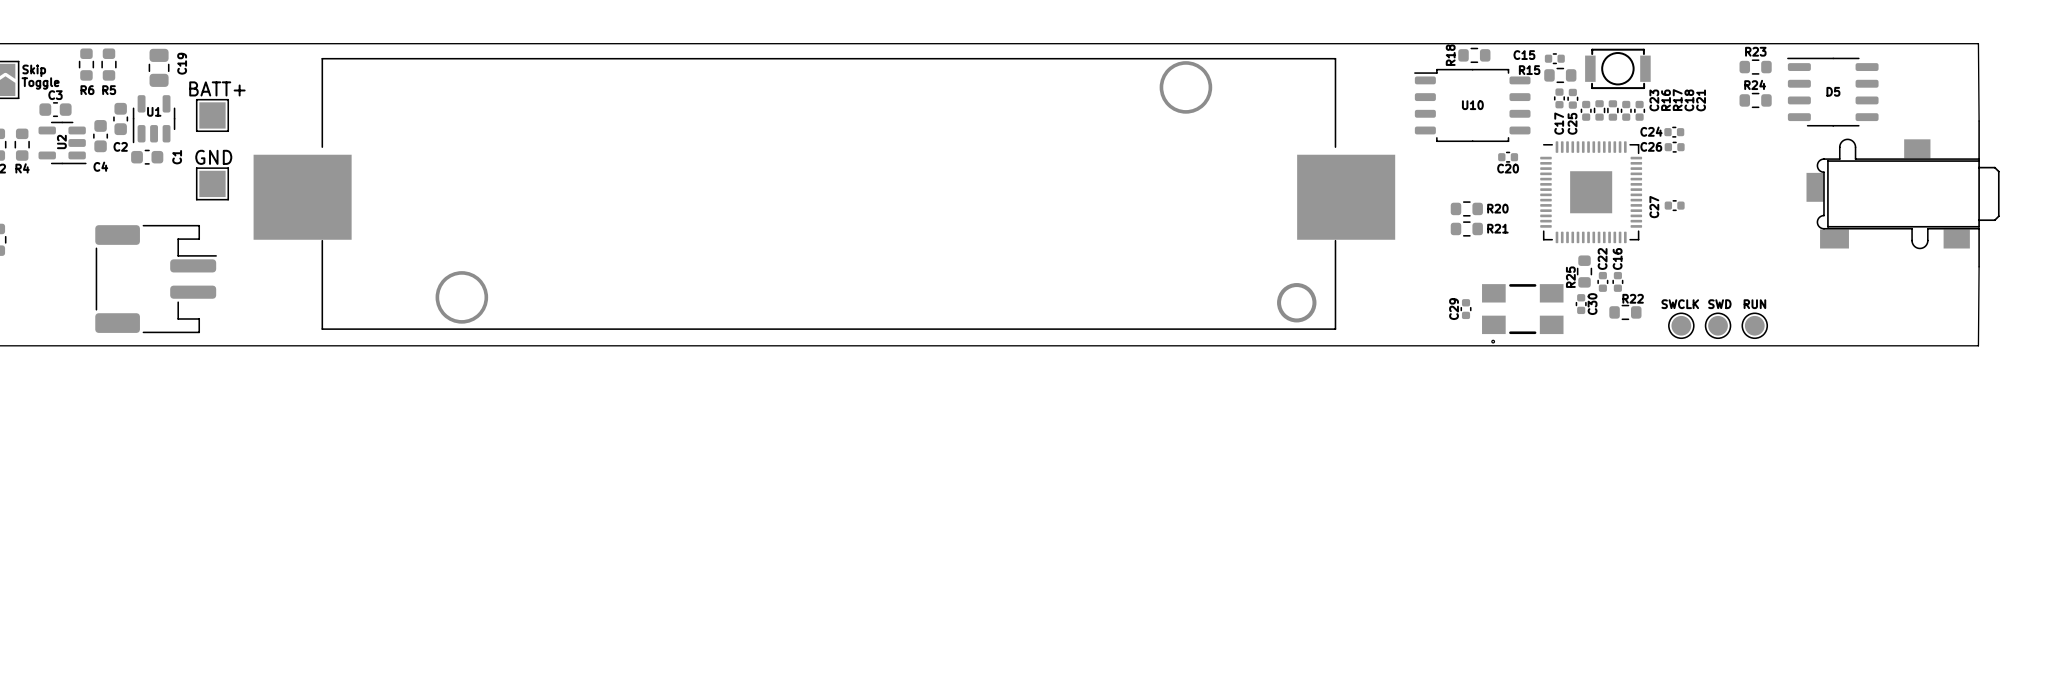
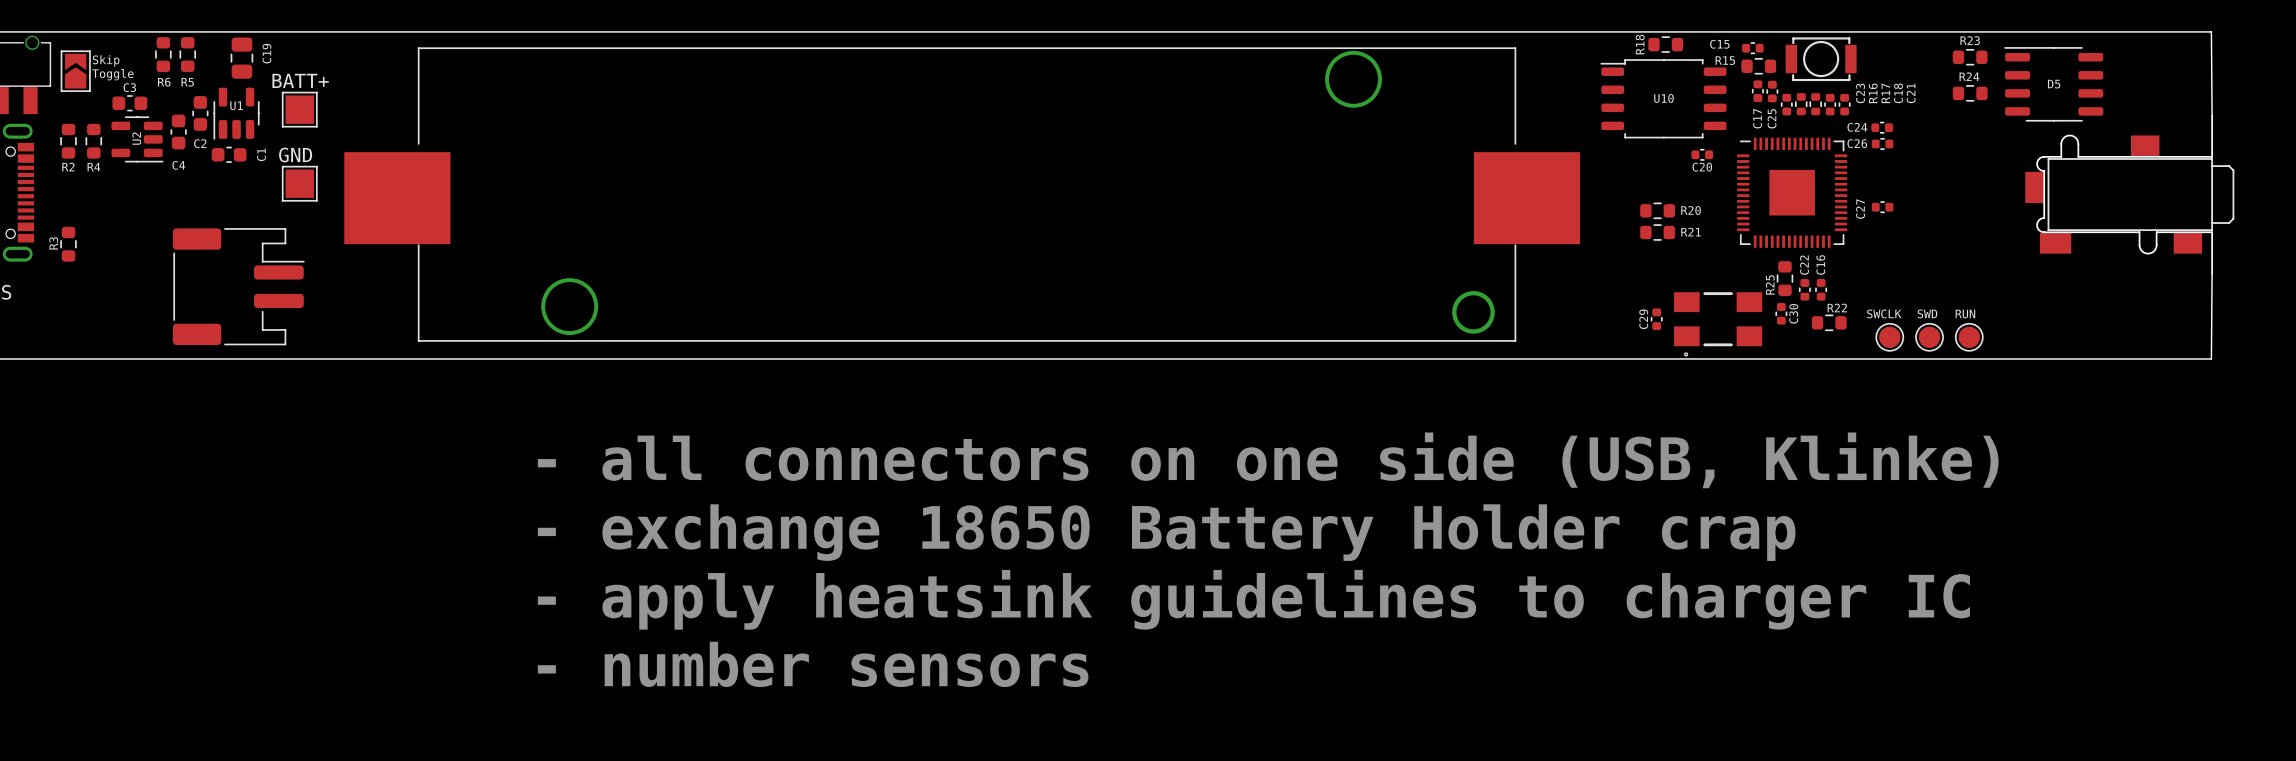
text: none -> - all connectors on one side (USB, Klinke) (1268, 460)
text: none -> - exchange 18650 Battery Holder crap (1166, 532)
text: none -> - apply heatsink guidelines to charger IC (1253, 599)
text: none -> - number sensors (813, 664)

